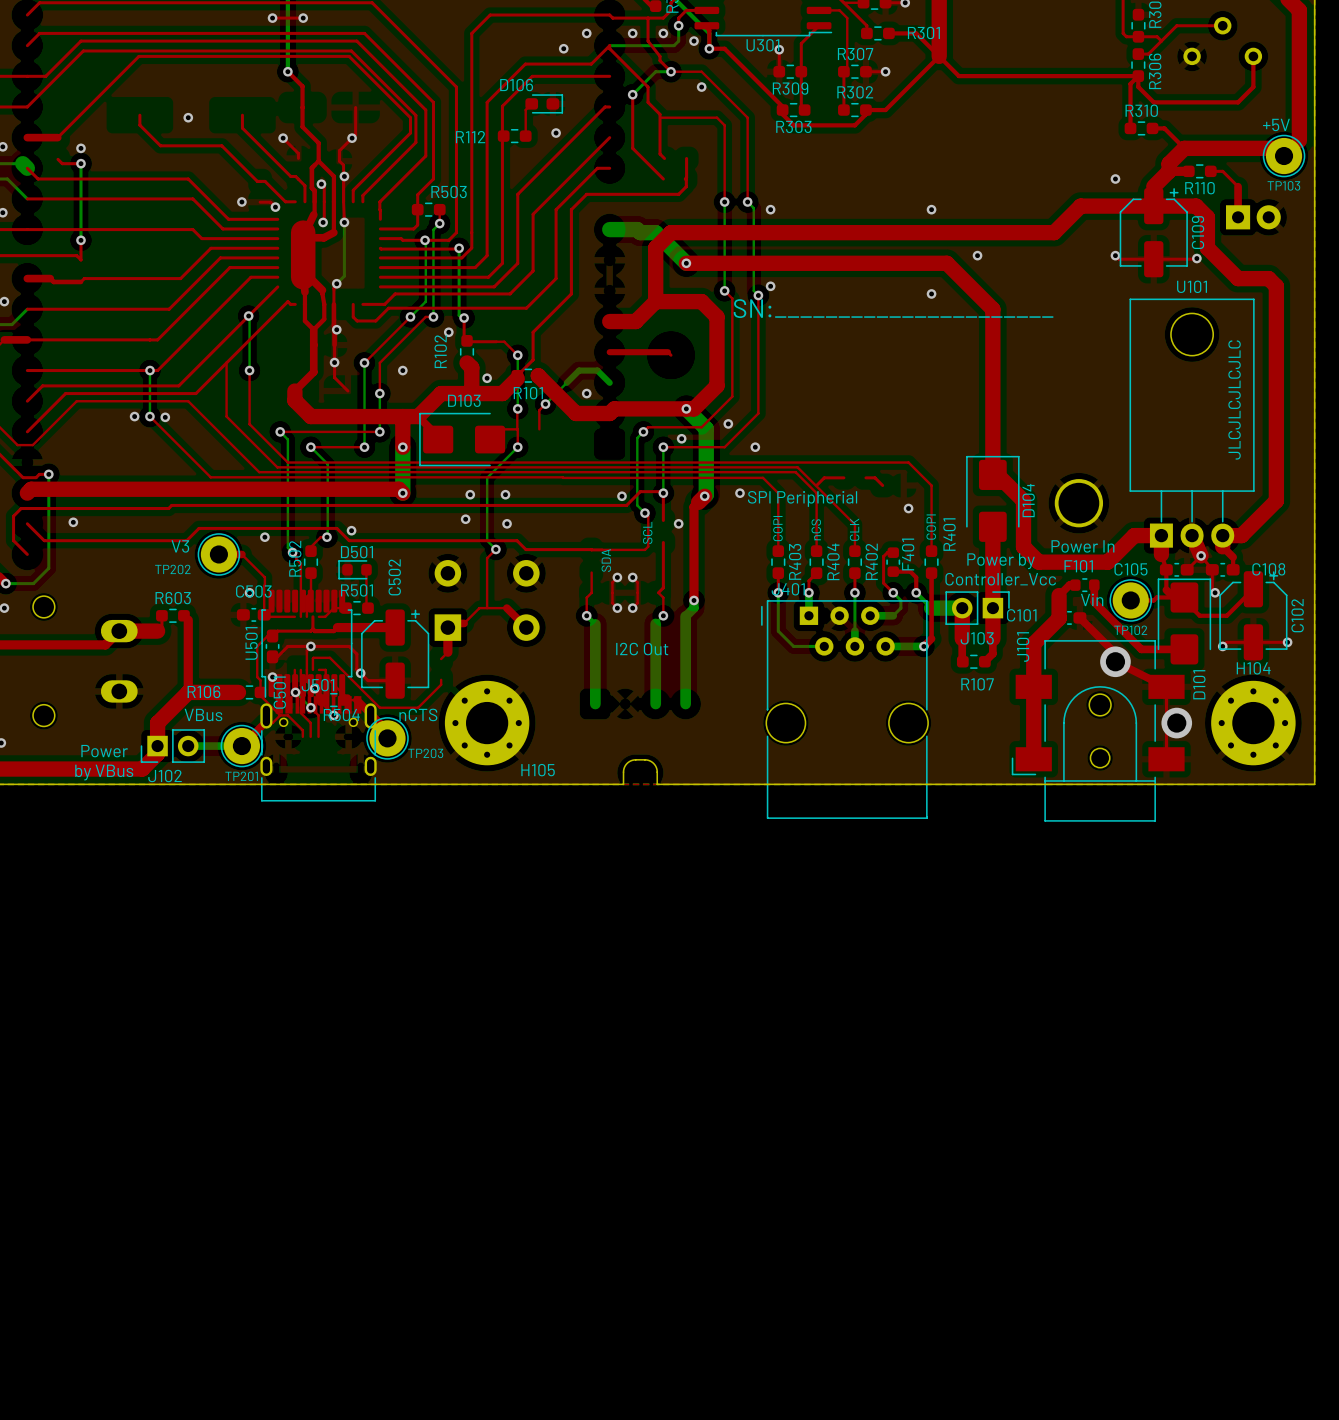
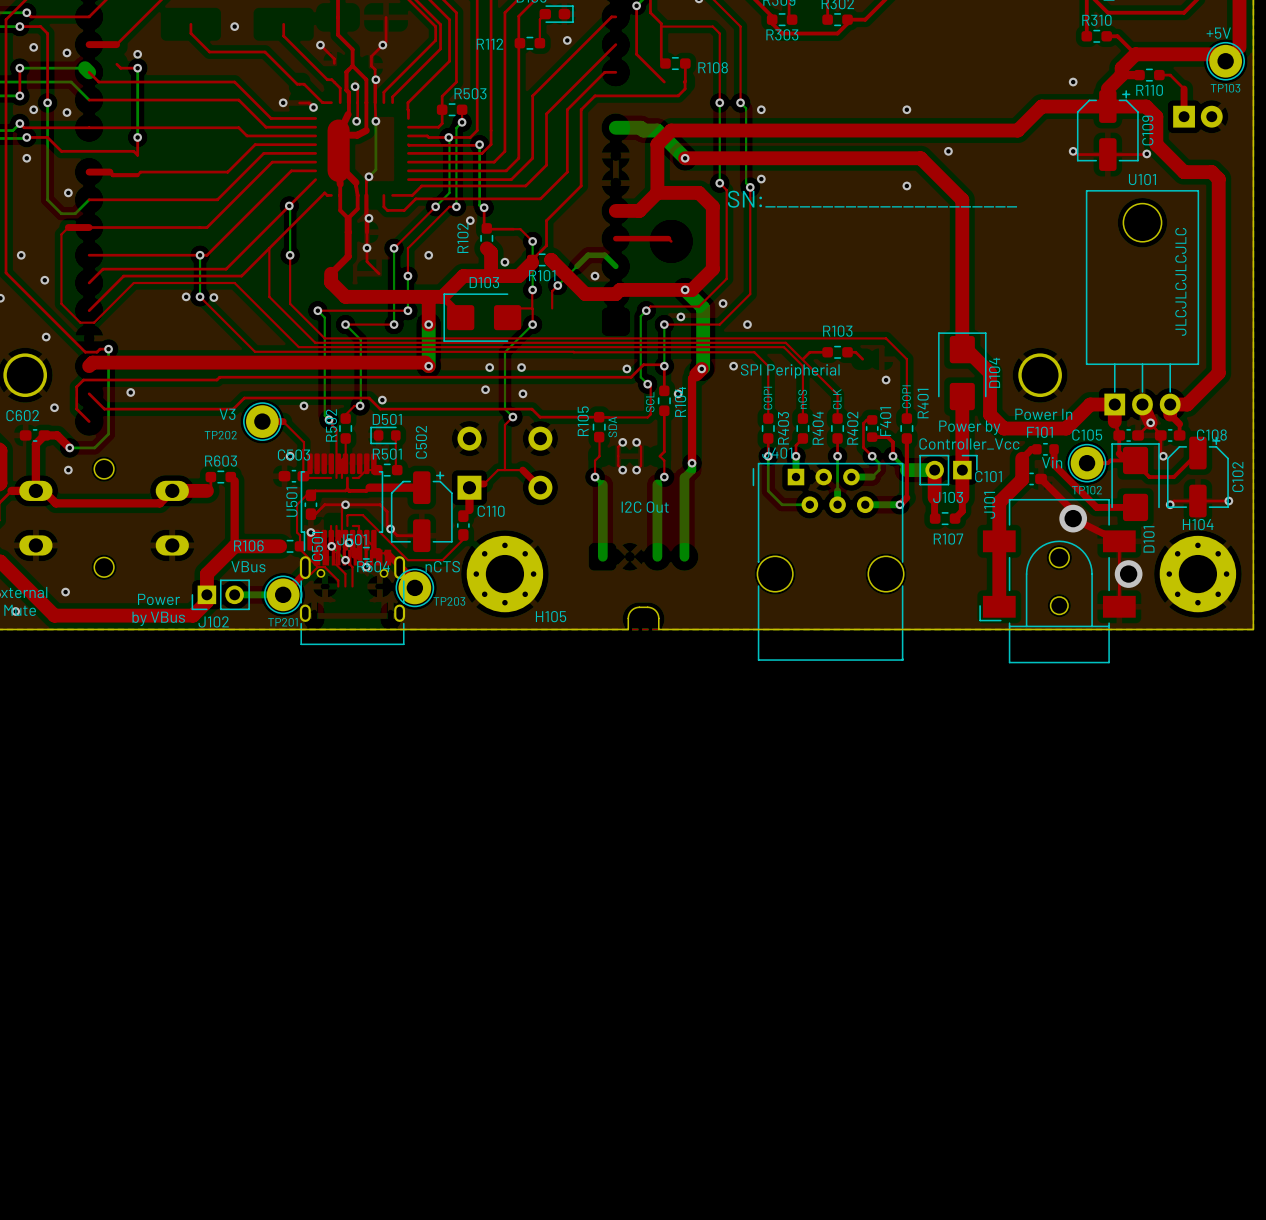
R108: none -> (675, 63)
R103: none -> (837, 352)
R104: none -> (664, 400)
R105: none -> (599, 427)
C110: none -> (463, 525)

